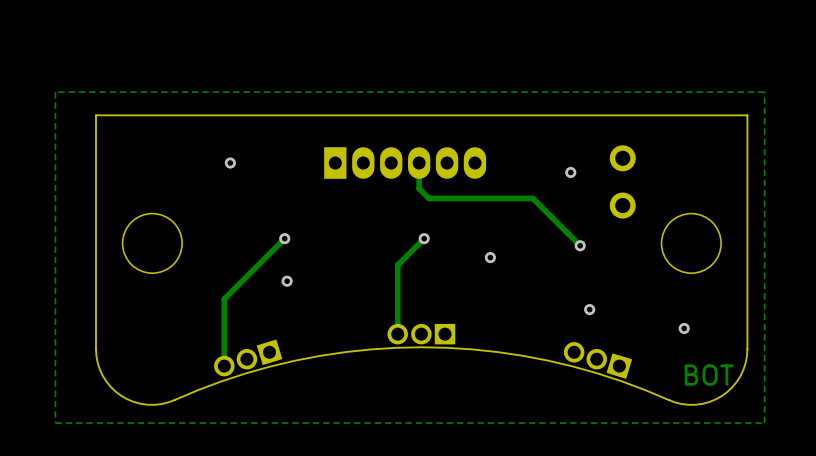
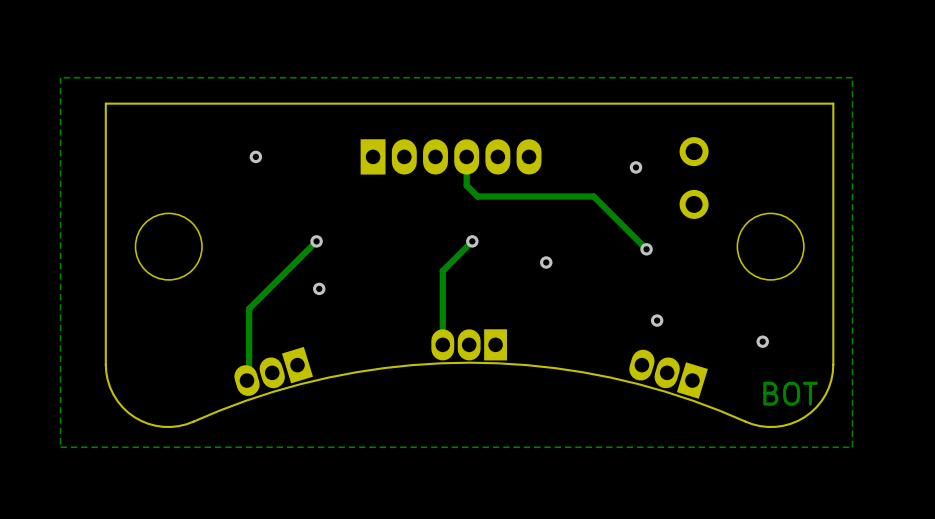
part footprint: [387, 323, 456, 345] -> [431, 329, 508, 361]
part footprint: [214, 339, 283, 377] -> [234, 346, 313, 396]
part footprint: [563, 342, 633, 379] -> [629, 349, 708, 399]

